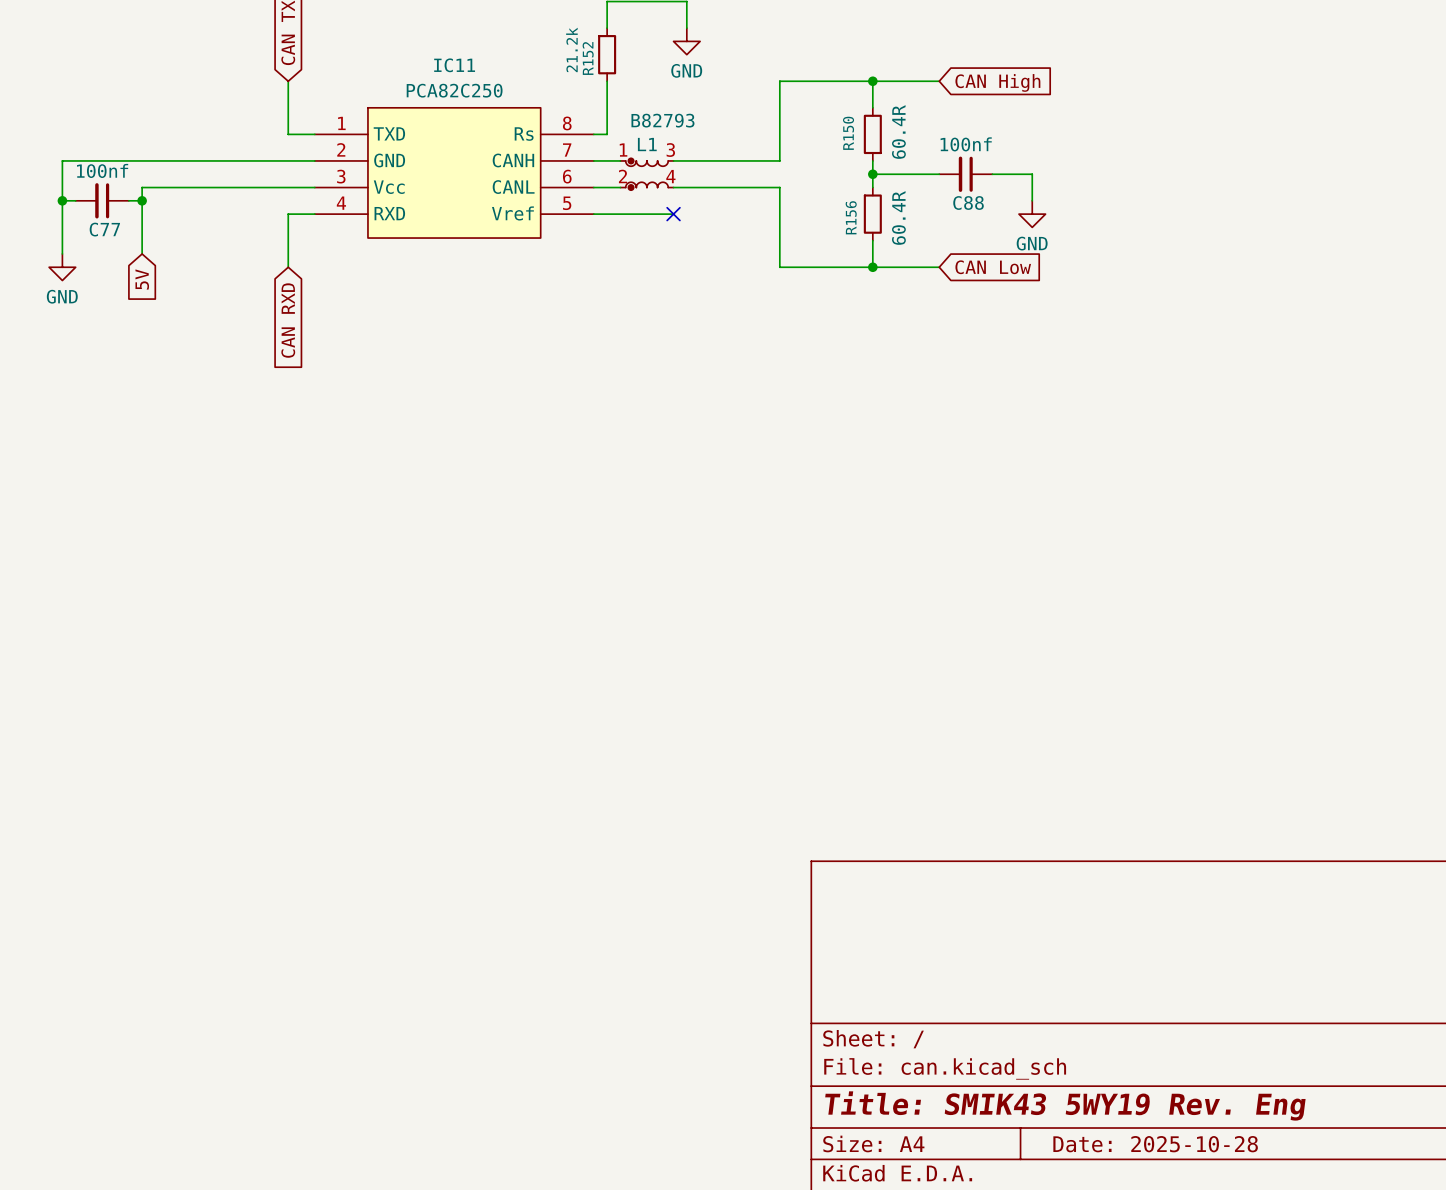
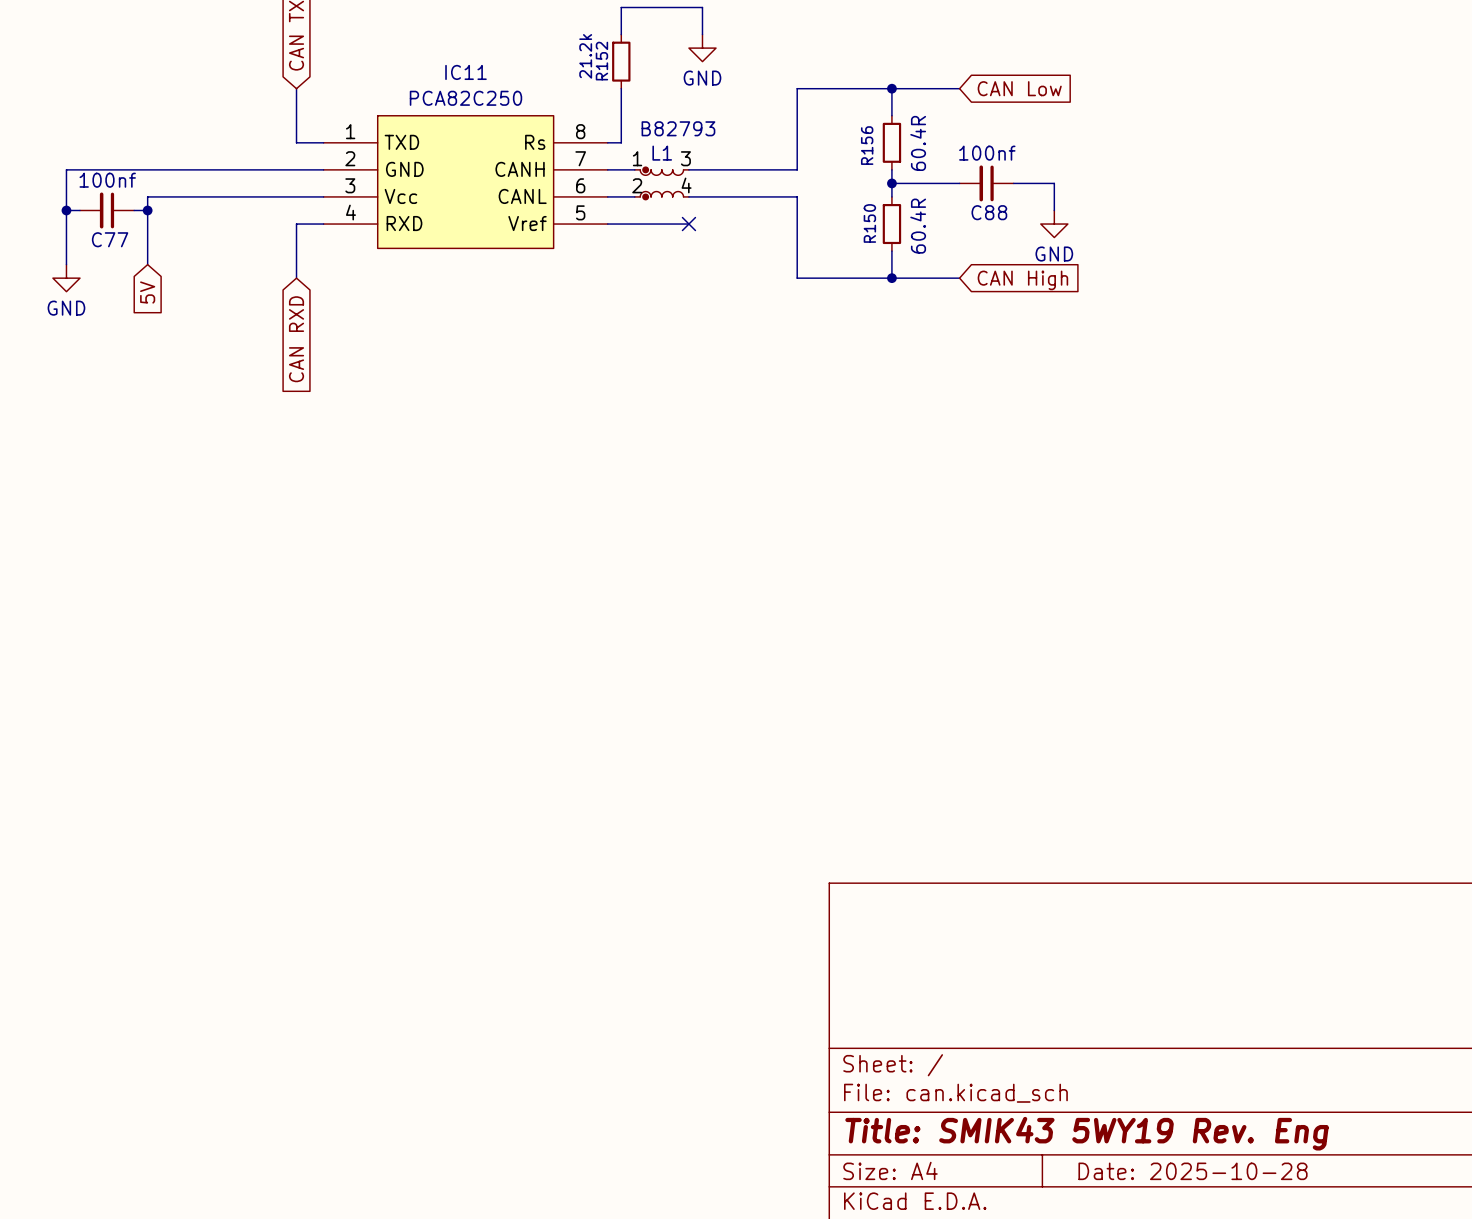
global label: CAN High (997, 82) -> CAN Low (1019, 88)
R150 name: R150 (848, 133) -> R156 (867, 145)
R156 name: R156 (851, 217) -> R150 (869, 223)
global label: CAN Low (993, 267) -> CAN High (1022, 280)

